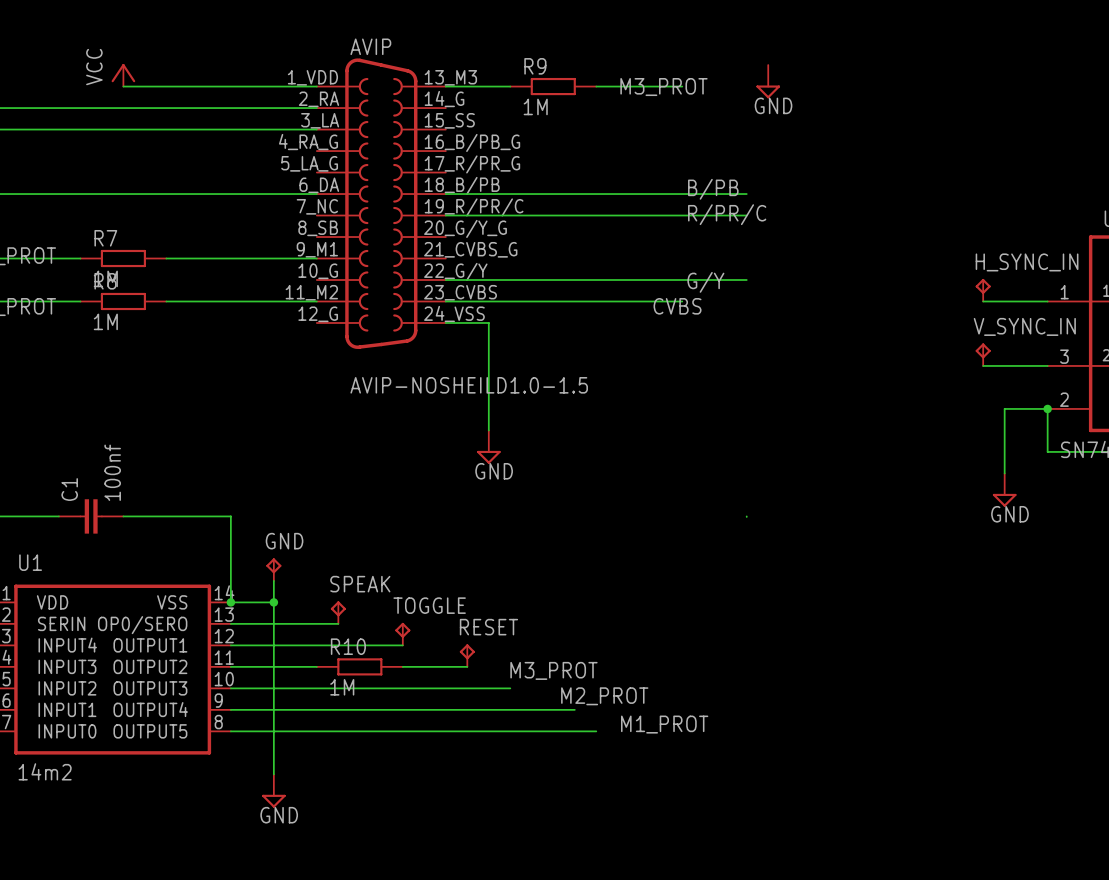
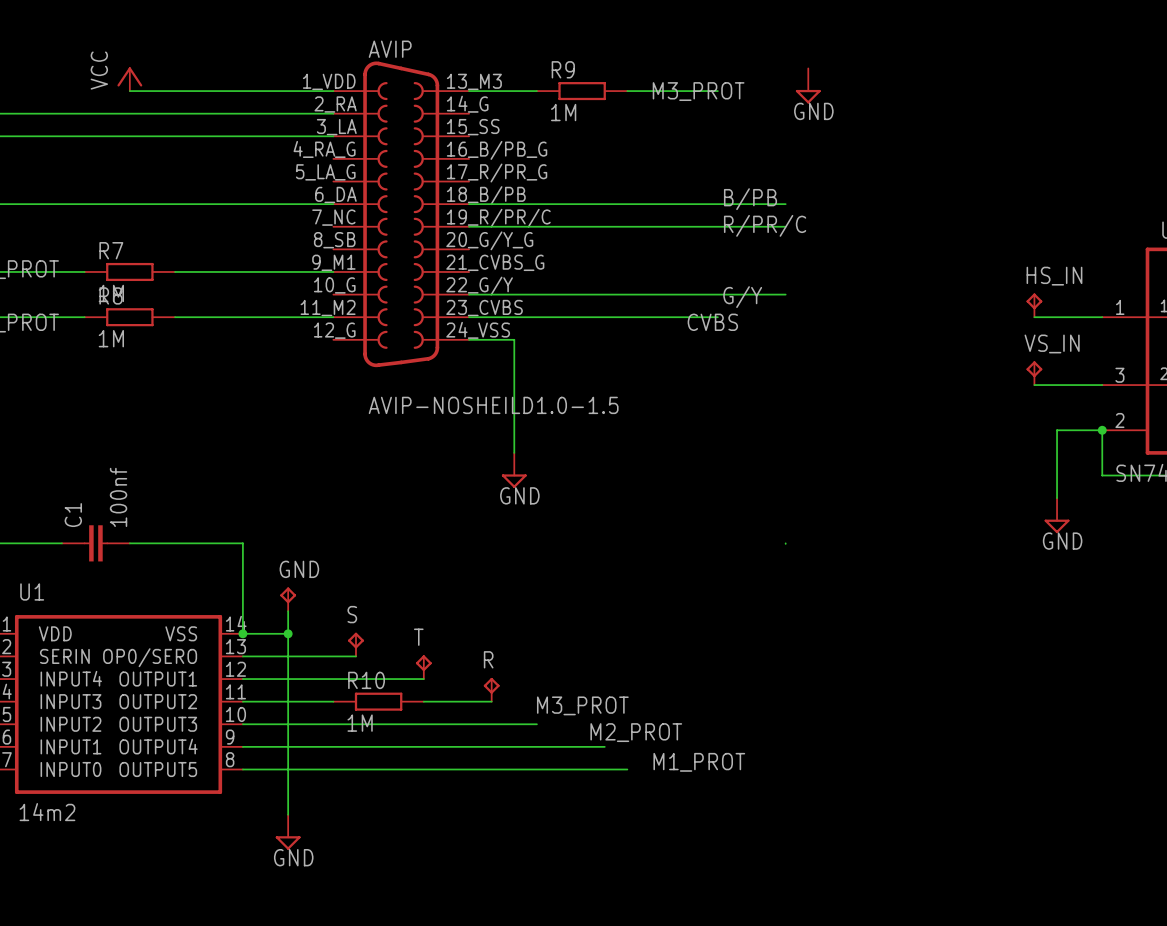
H_SYNC_IN name: H_SYNC_IN (1027, 262) -> HS_IN (1054, 276)
V_SYNC_IN name: V_SYNC_IN (1024, 326) -> VS_IN (1052, 343)
SPEAK name: SPEAK (360, 584) -> S (352, 614)
TOGGLE name: TOGGLE (429, 605) -> T (418, 637)
RESET name: RESET (488, 627) -> R (488, 659)

